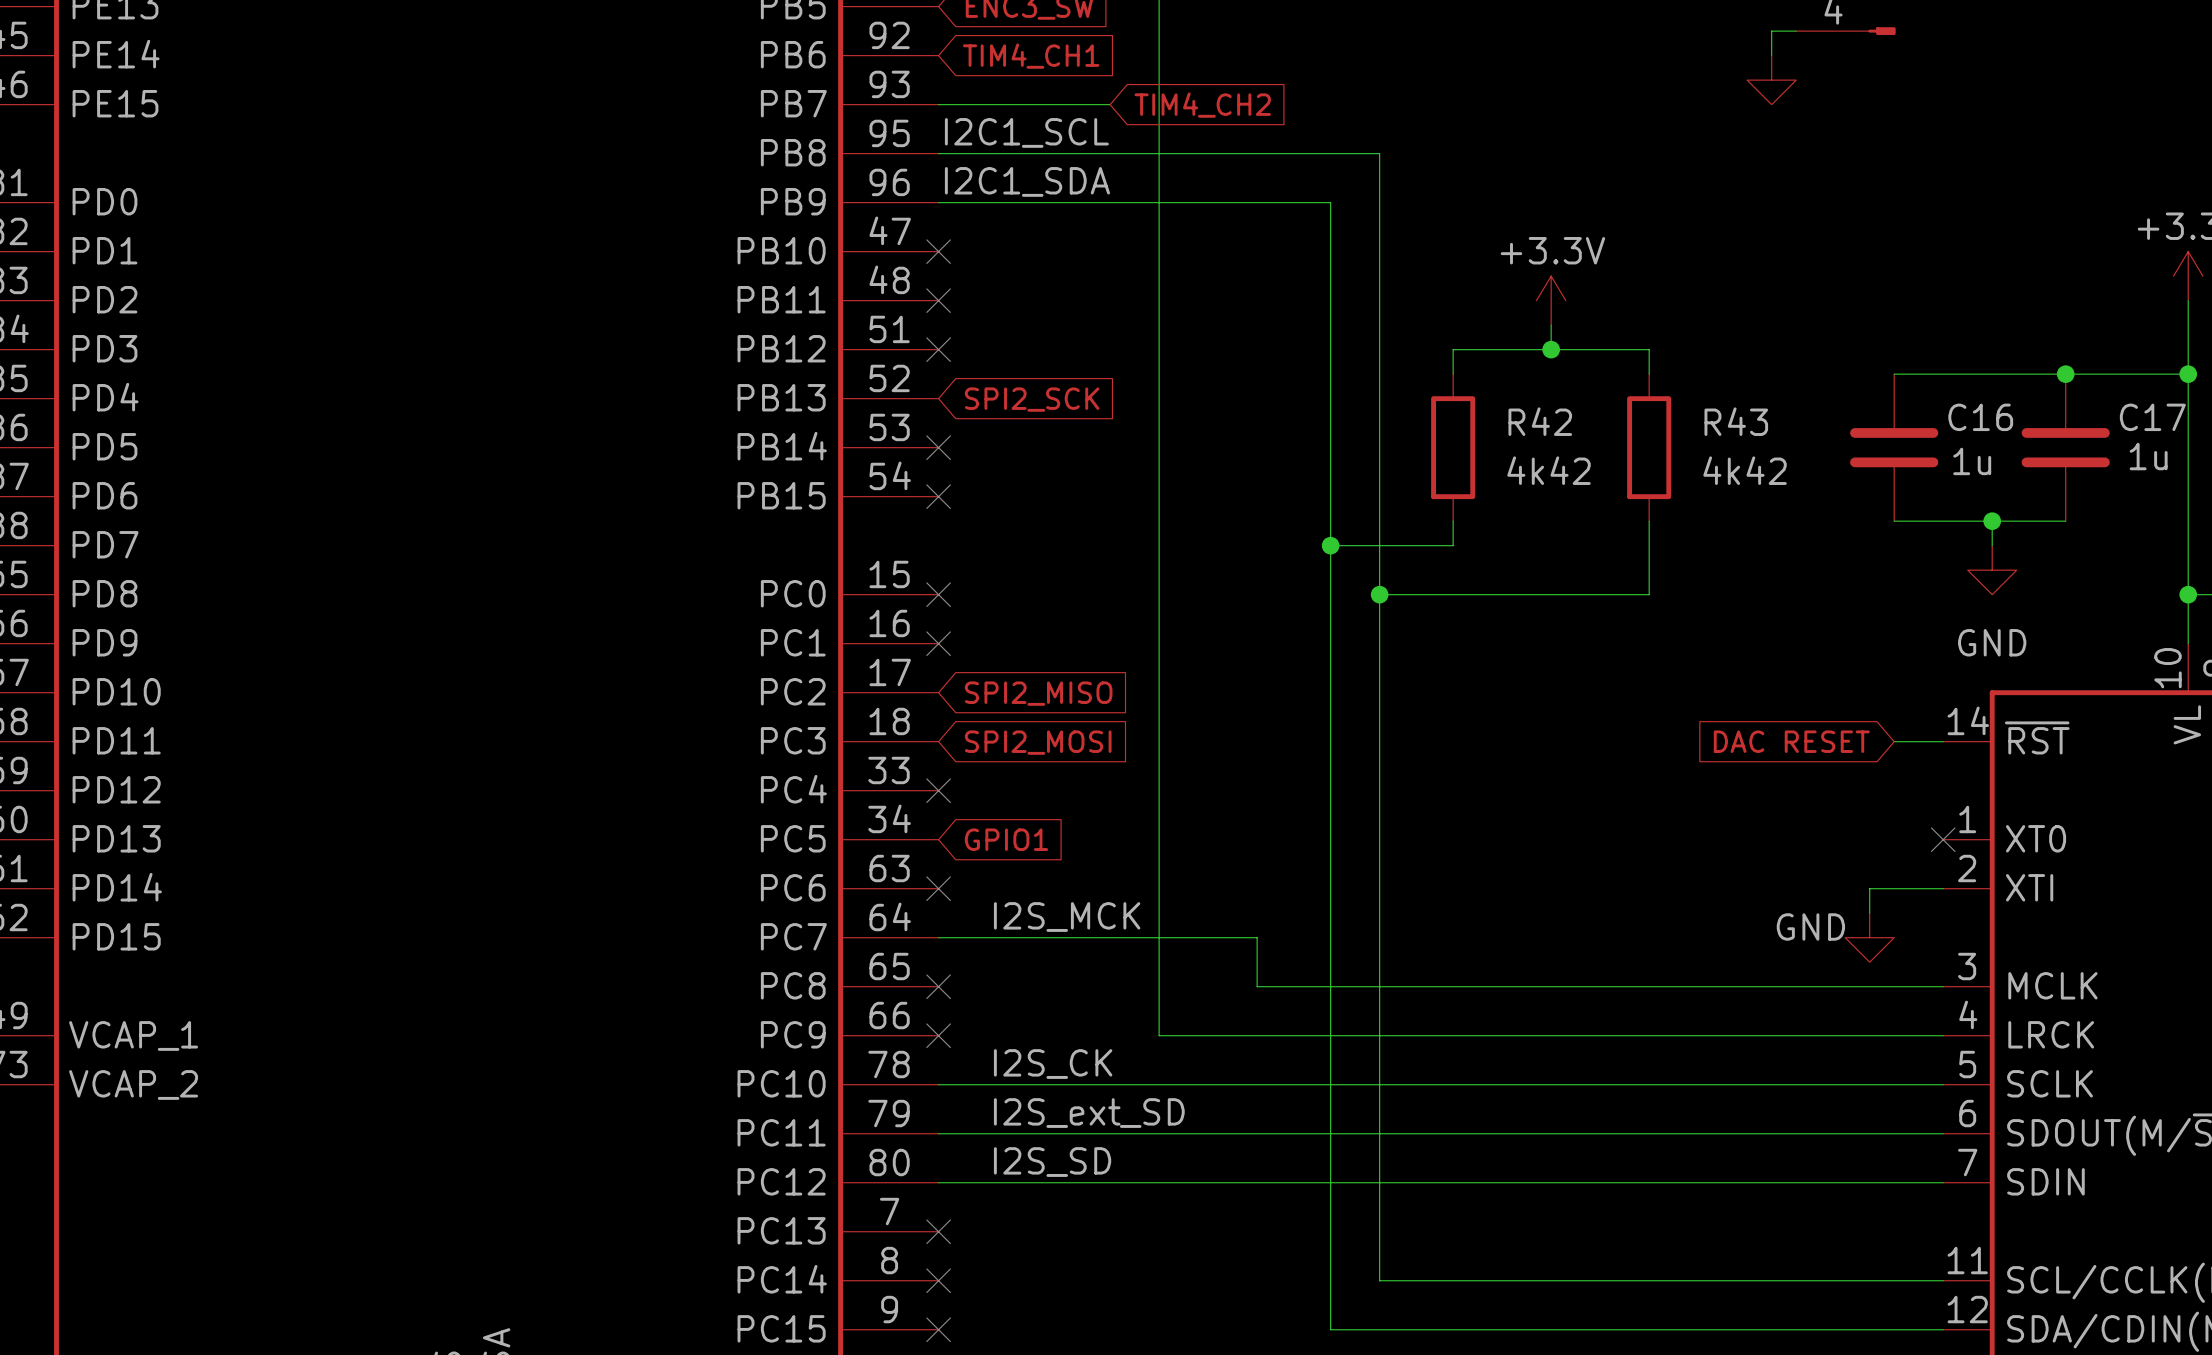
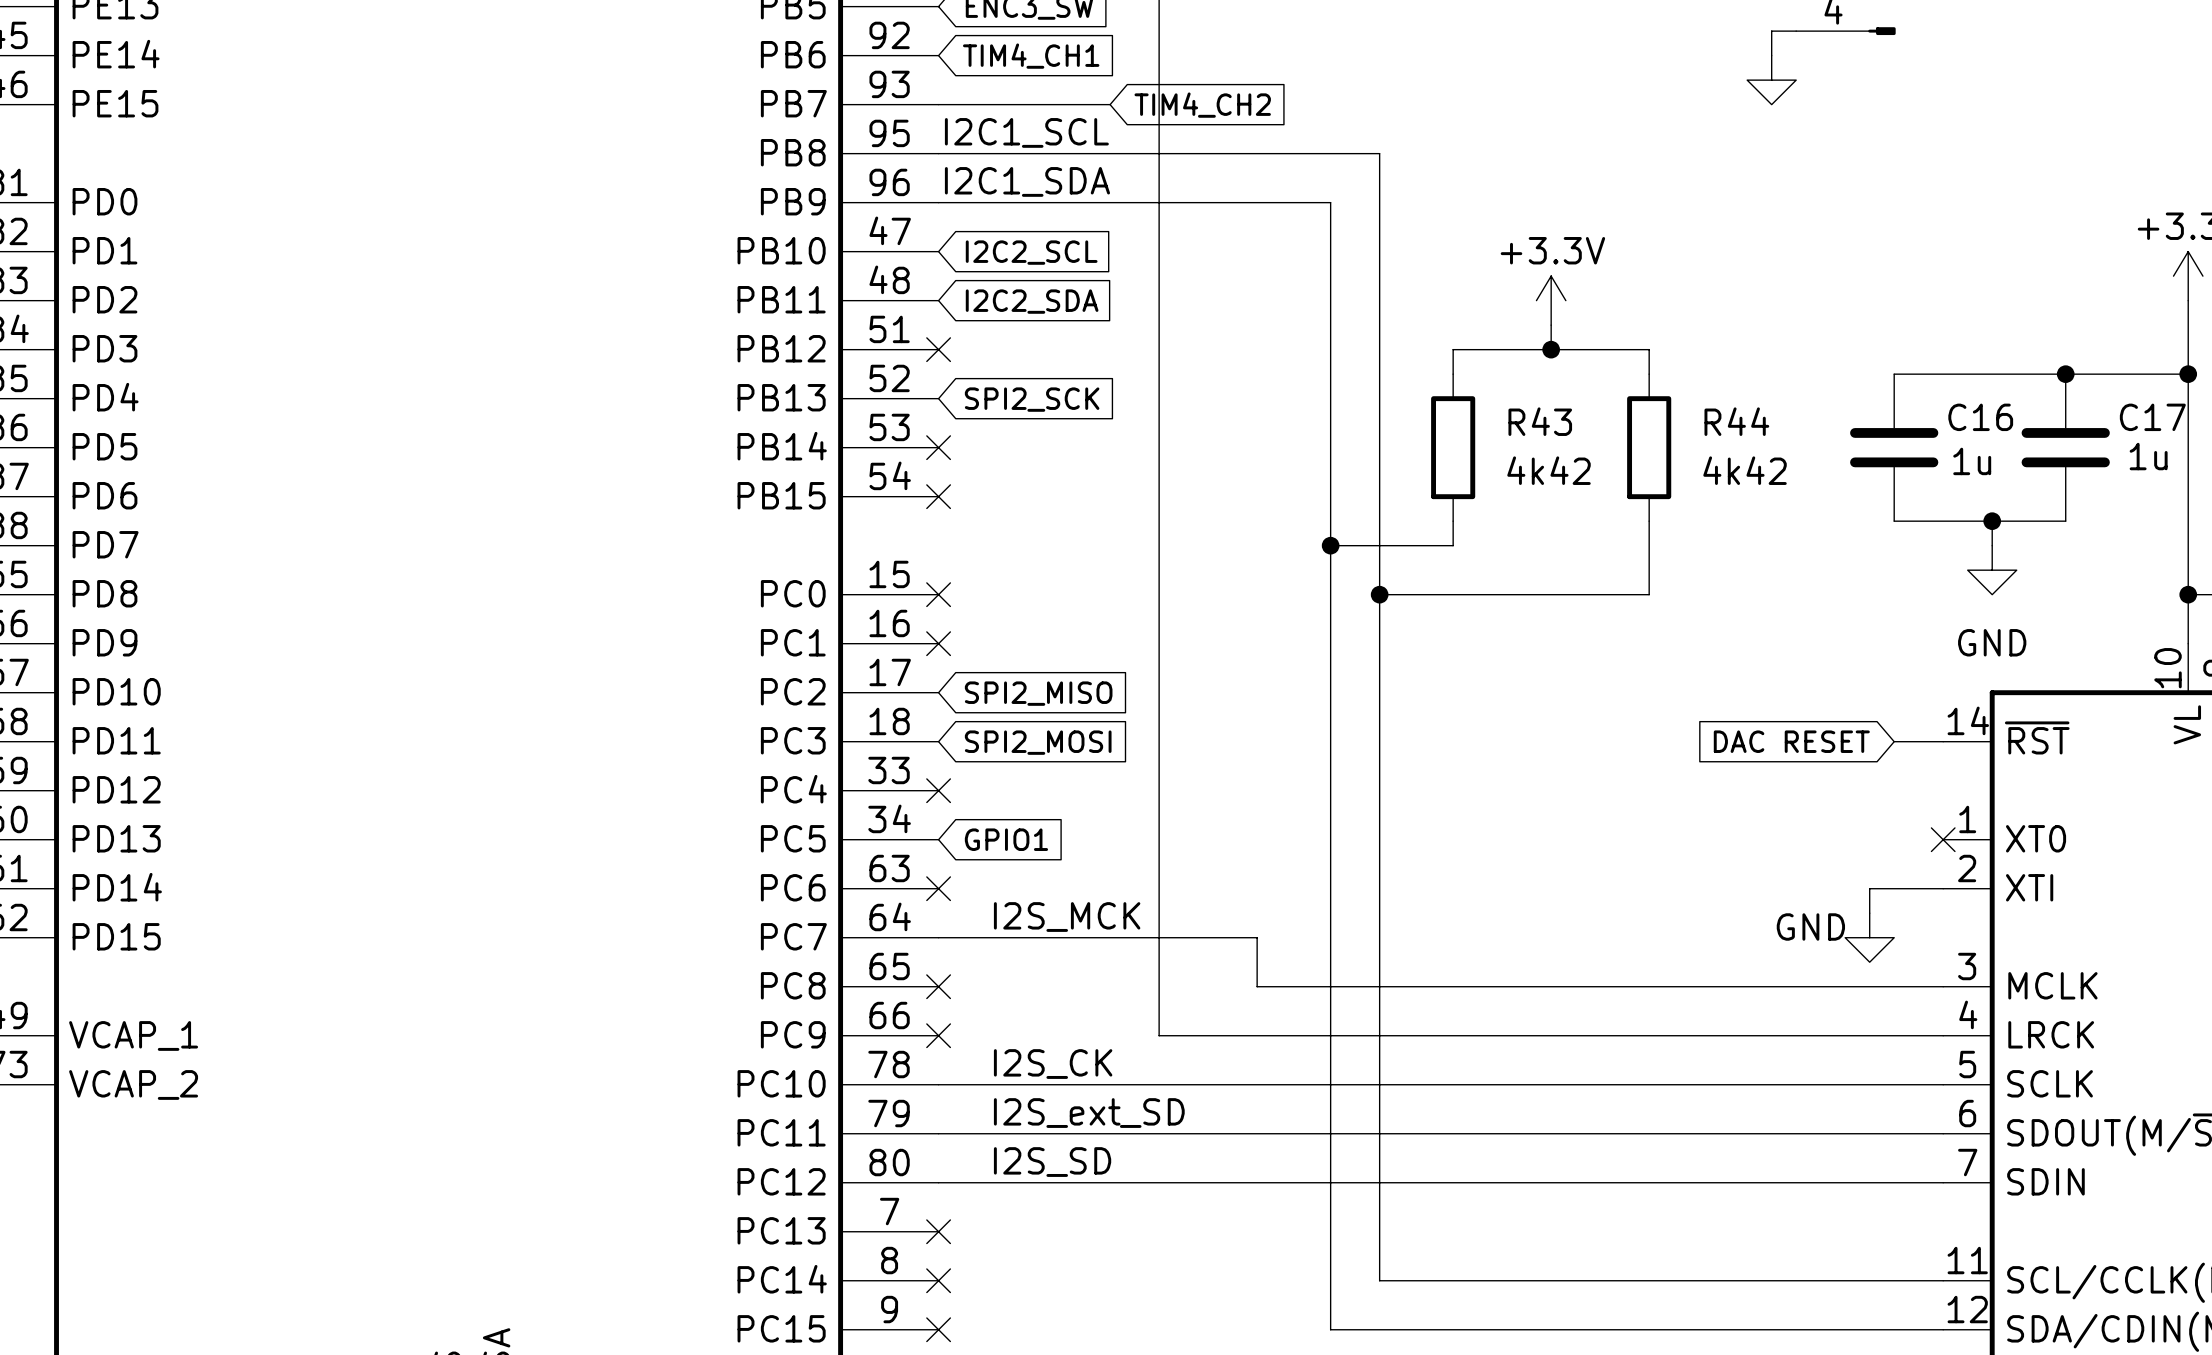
no-connect mark: (938, 251) -> none
global label: none -> I2C2_SCL (1031, 252)
no-connect mark: (938, 300) -> none
global label: none -> I2C2_SDA (1032, 301)
R42 name: R42 (1540, 421) -> R43 (1540, 421)
R43 name: R43 (1736, 421) -> R44 (1736, 421)

